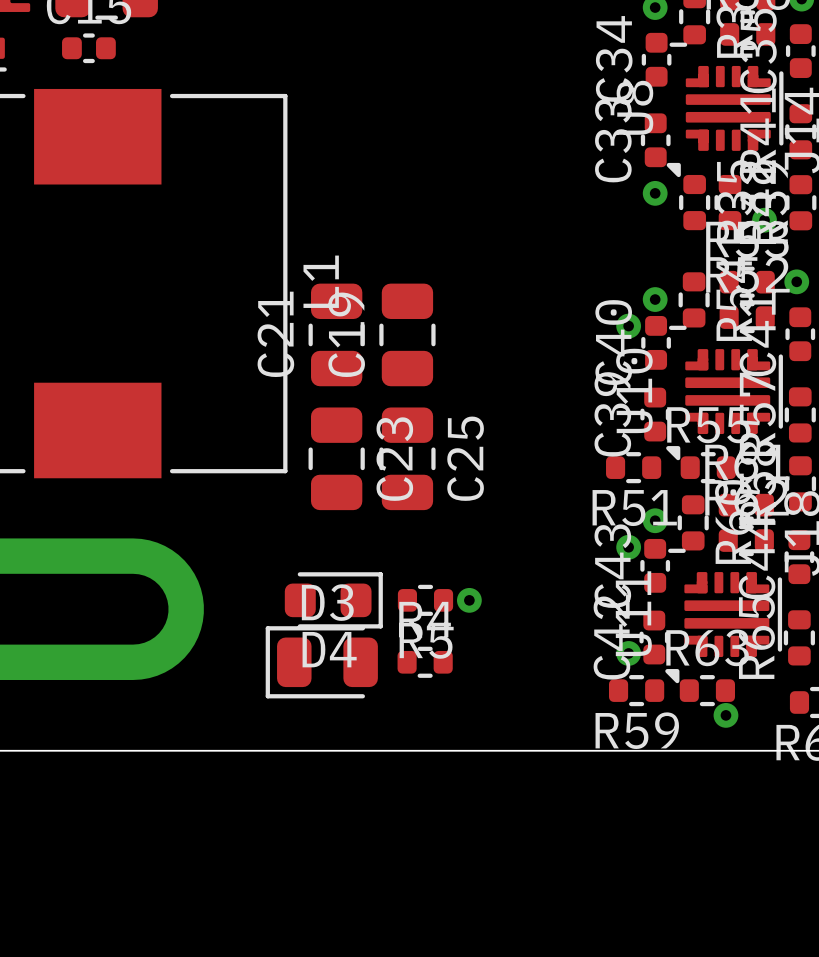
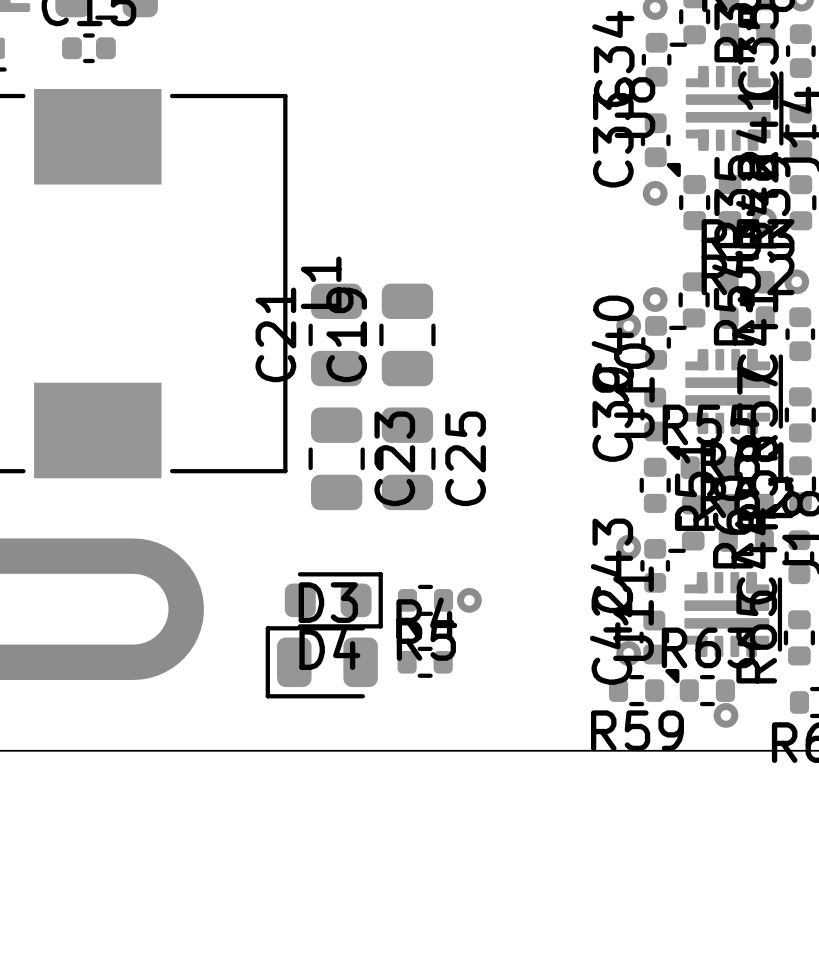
R51 rotation: 0° (633, 467) -> 90° clockwise (655, 485)
via: (655, 520) -> none

